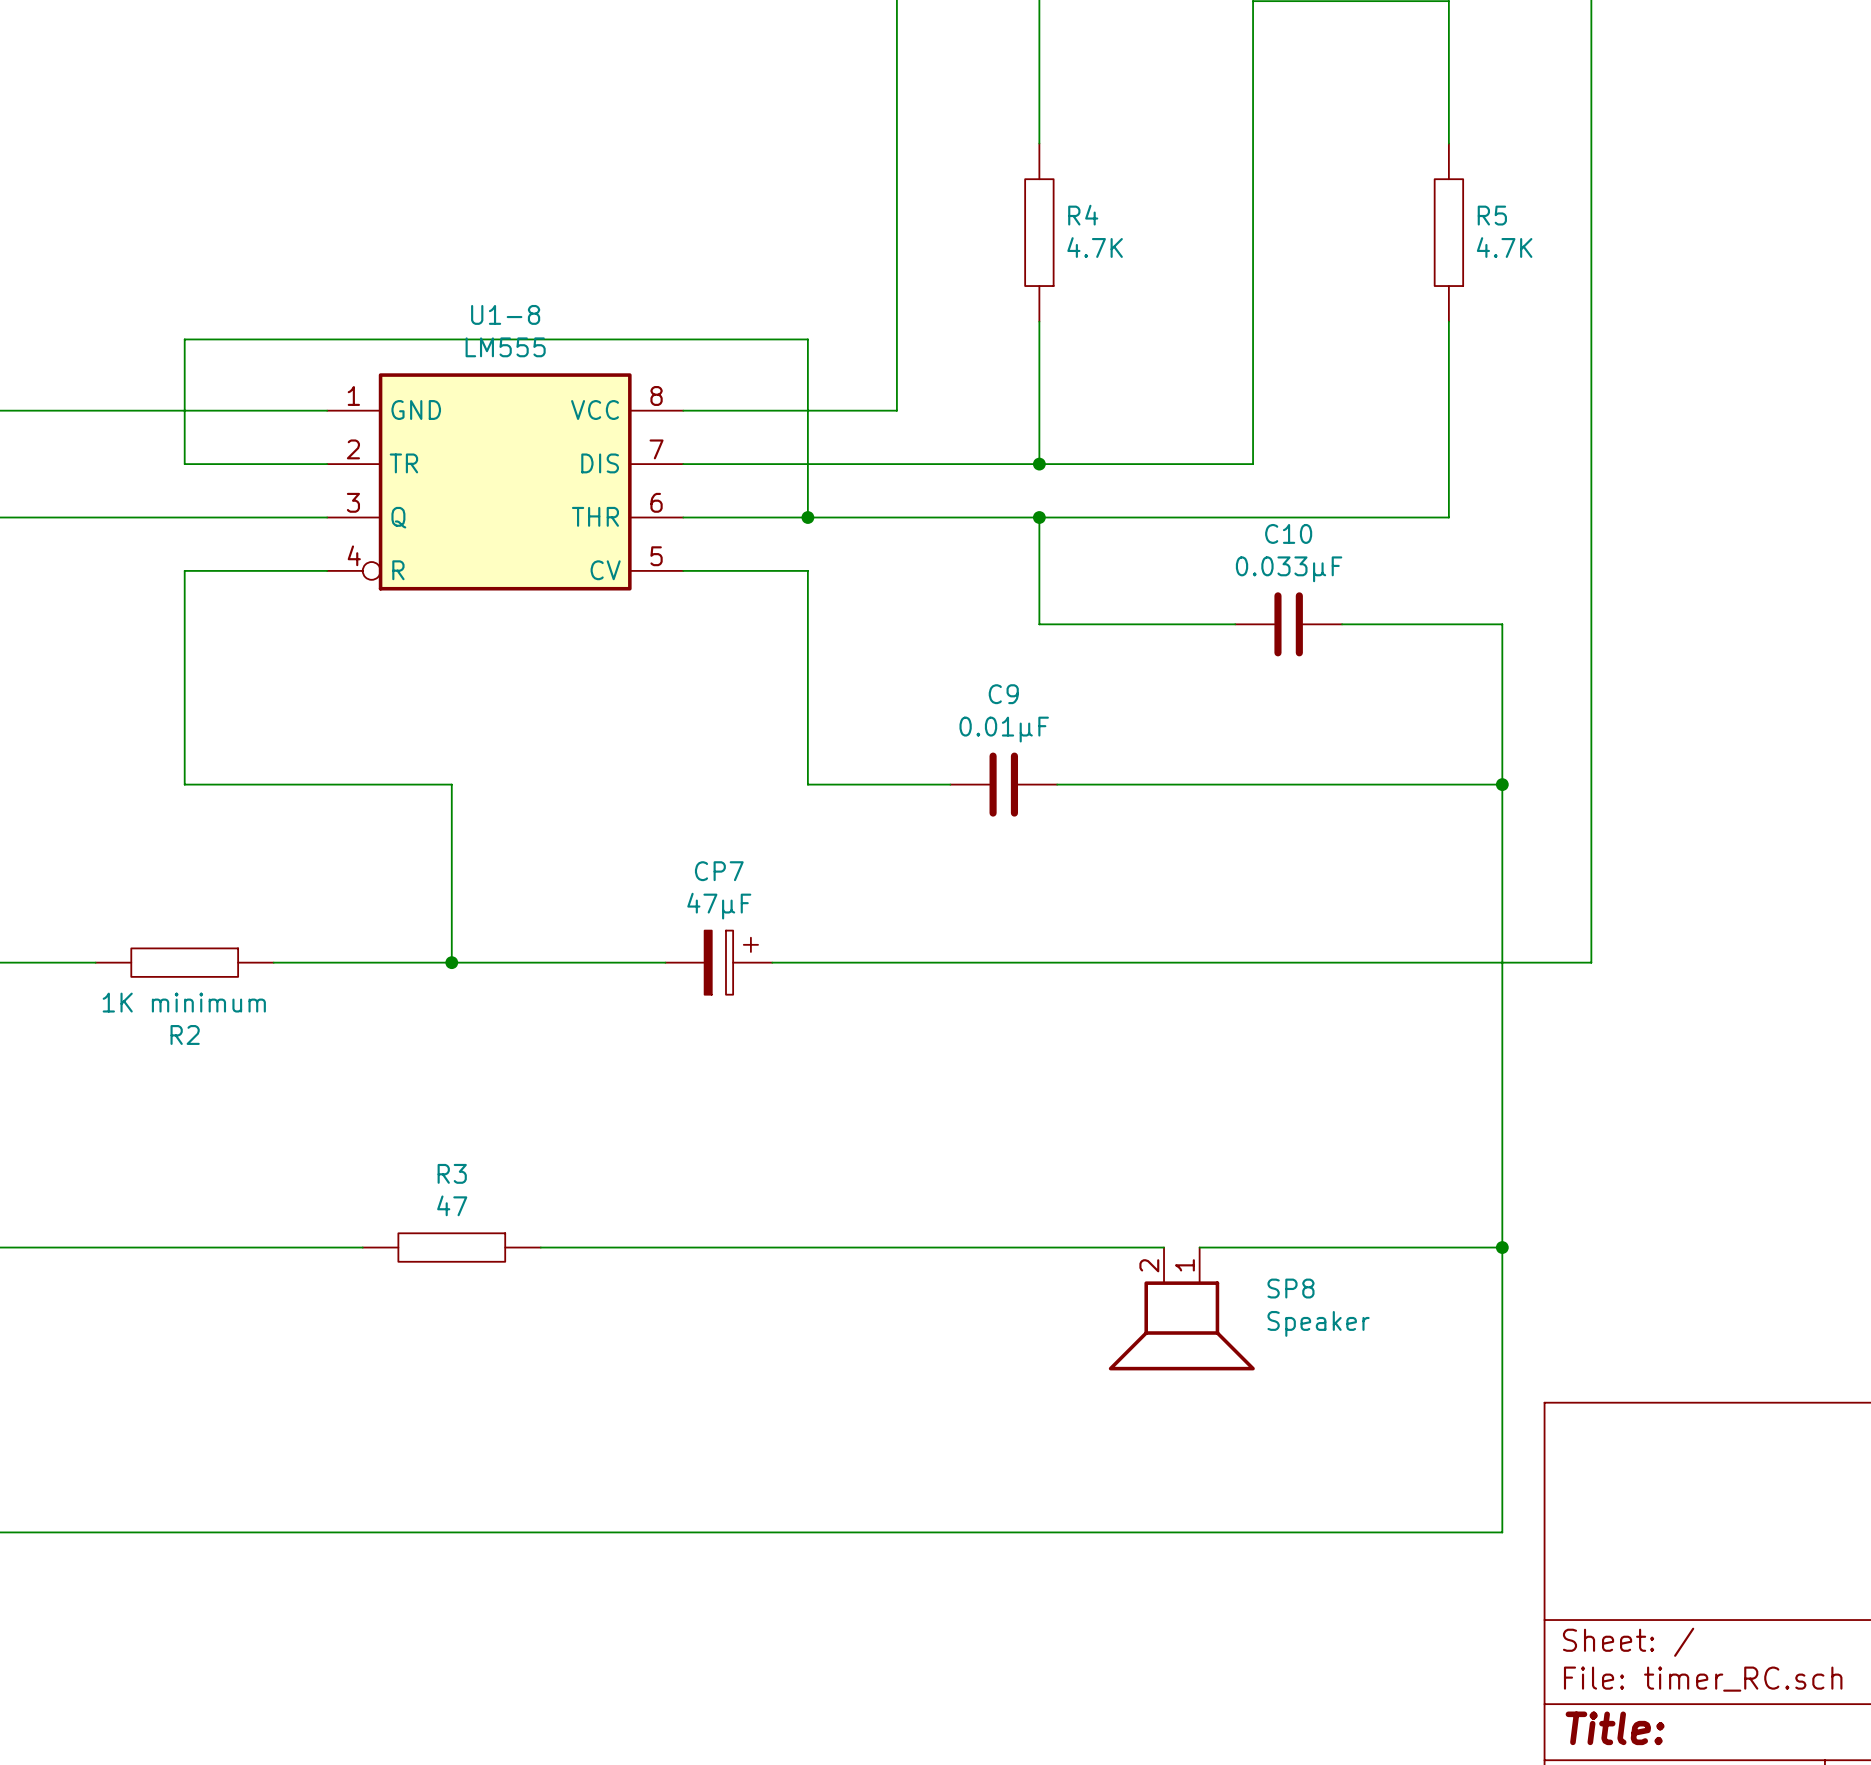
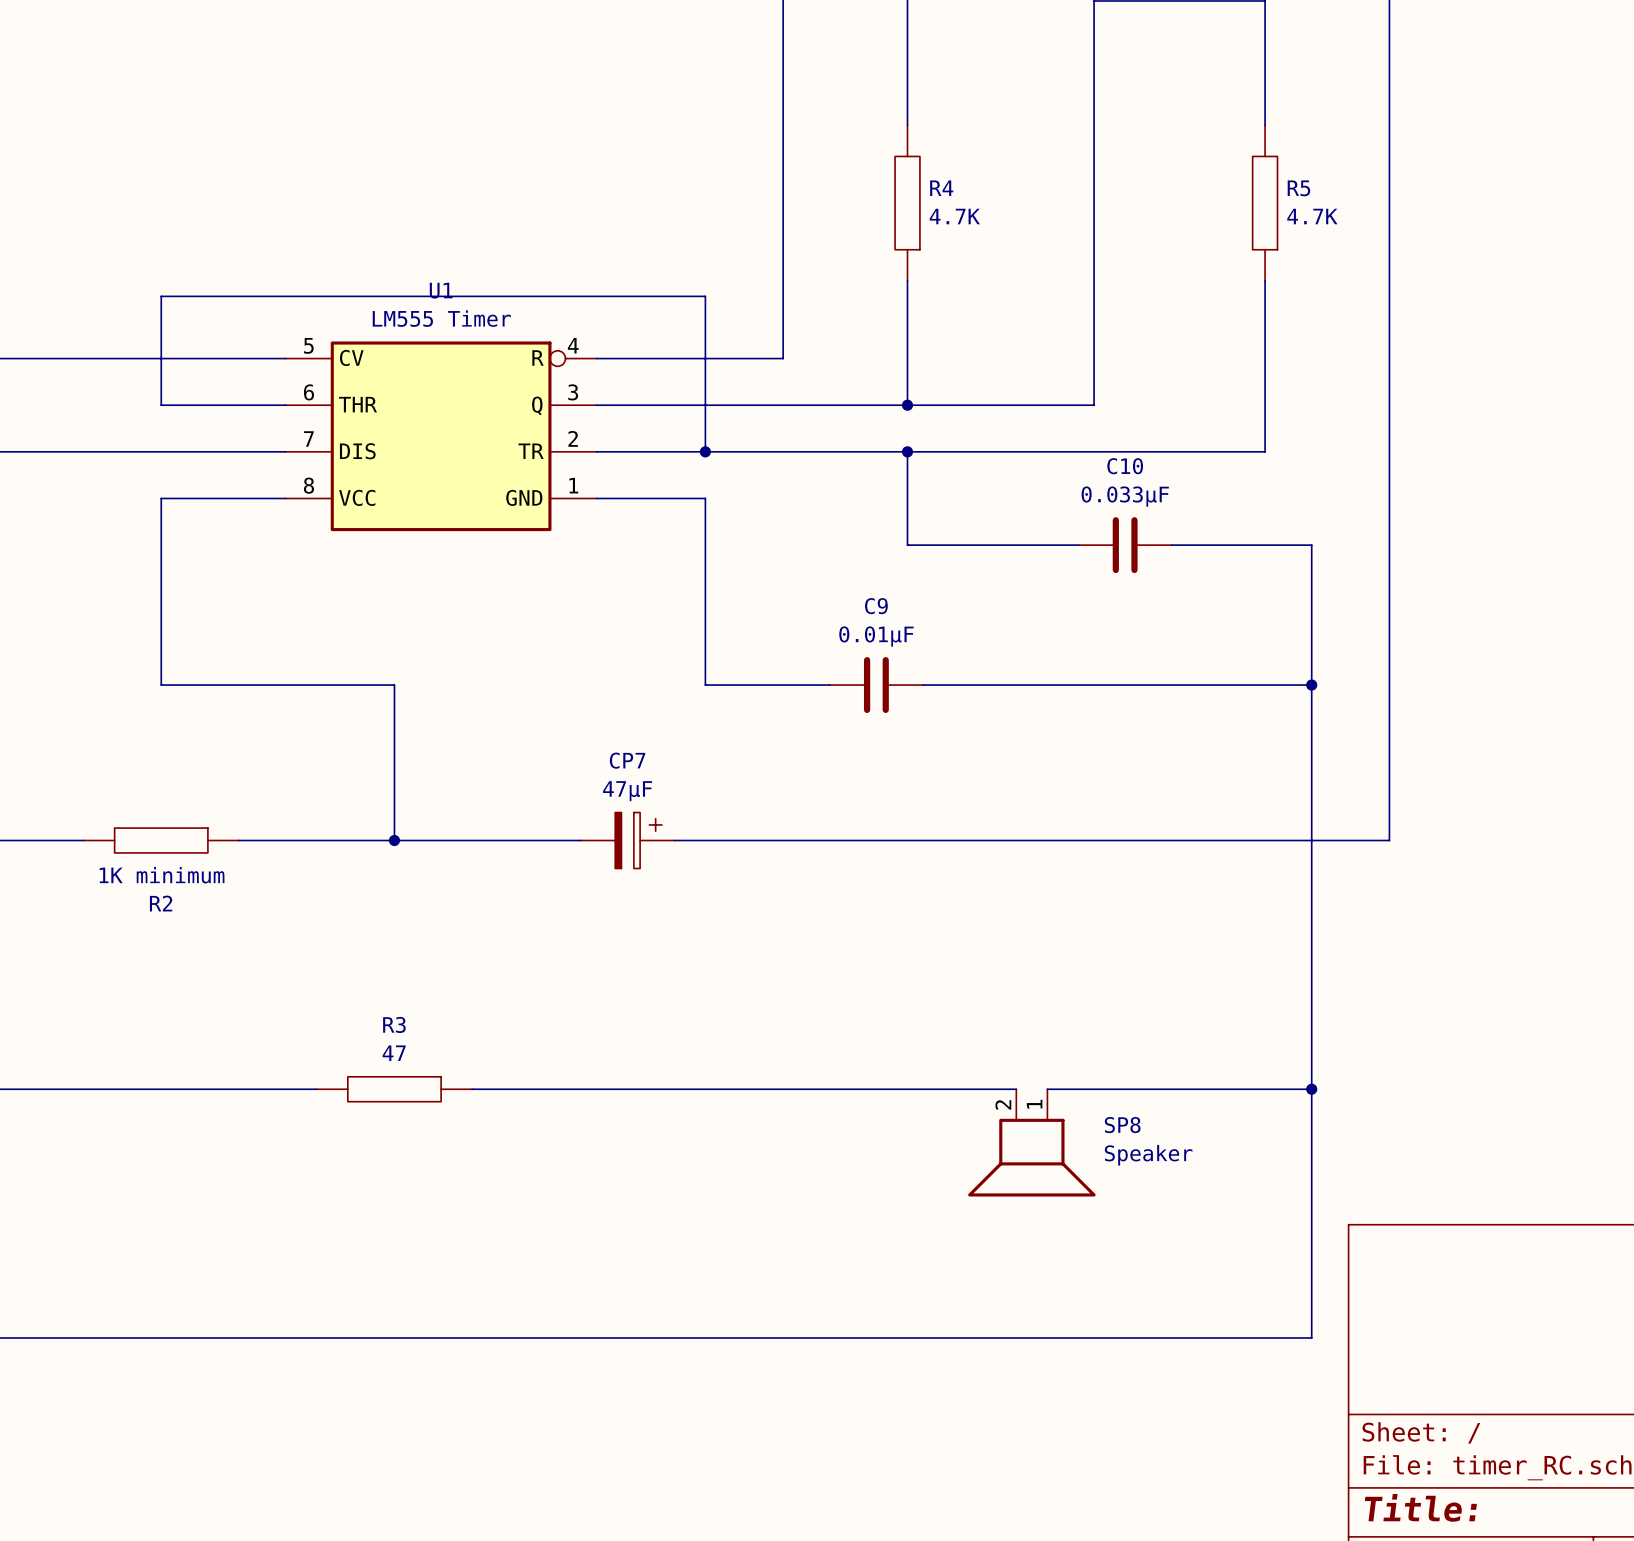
U1-8: LM555 (505, 481) -> none
U1: none -> LM555 Timer (441, 436)

